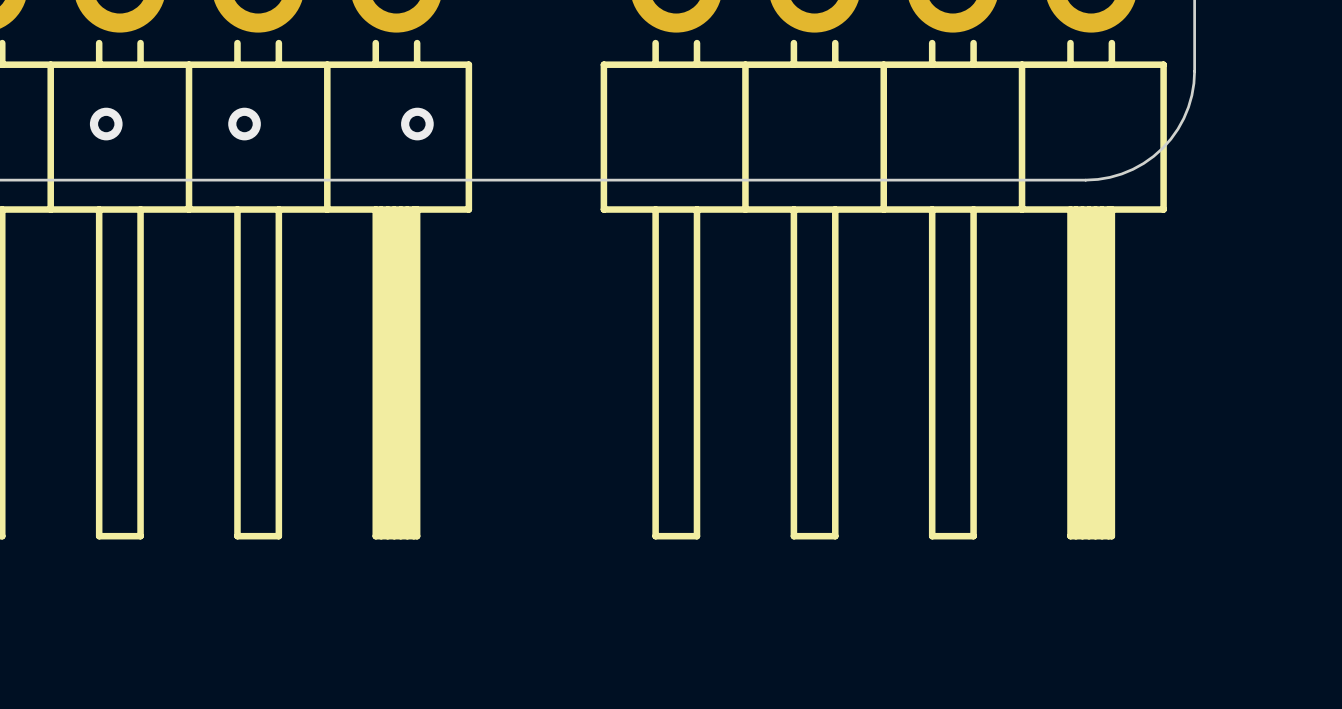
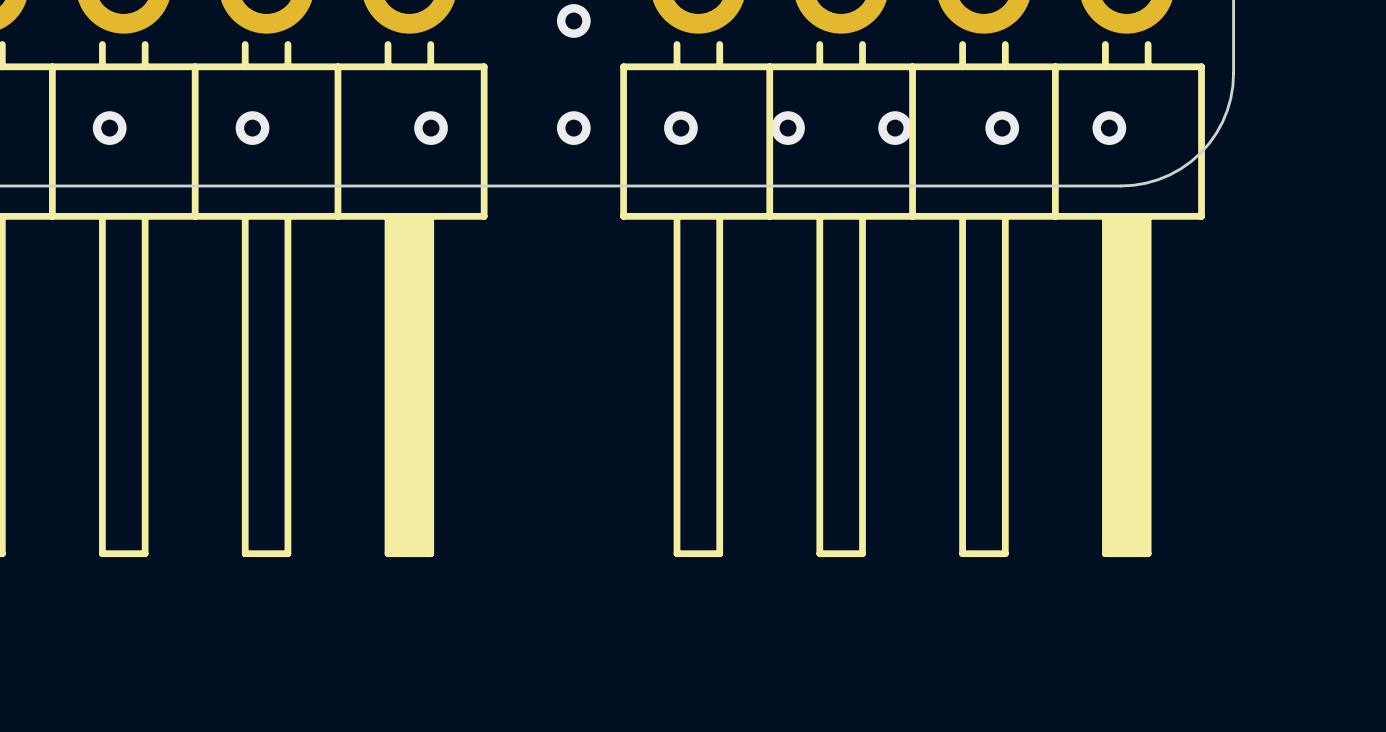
via: none -> (573, 20)
via: none -> (573, 128)
via: none -> (680, 128)
via: none -> (788, 128)
via: none -> (895, 128)
via: none -> (1002, 128)
via: none -> (1109, 128)

